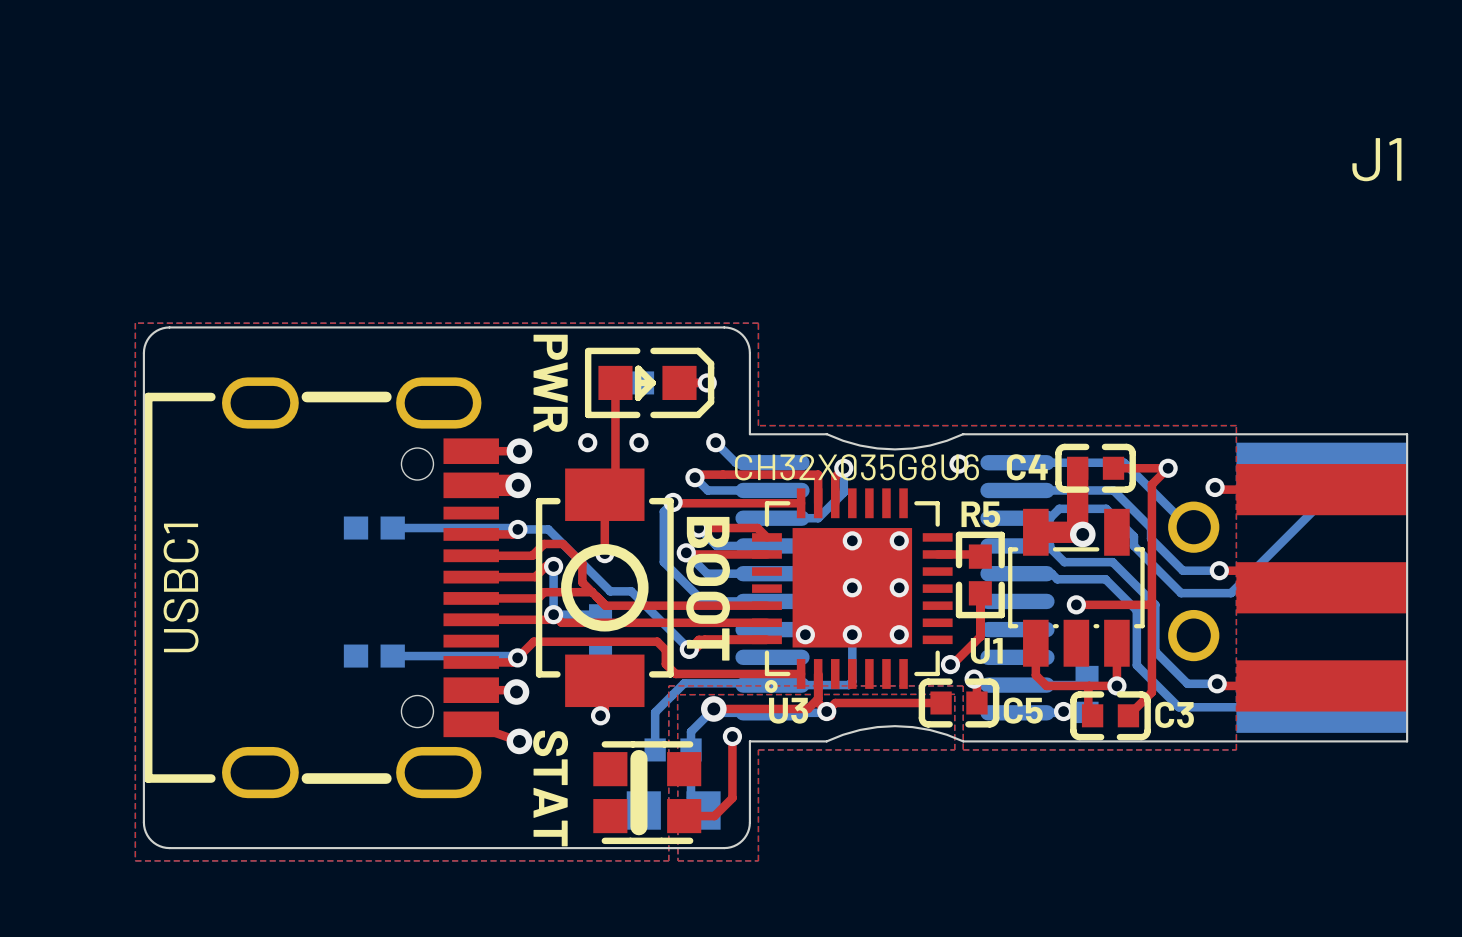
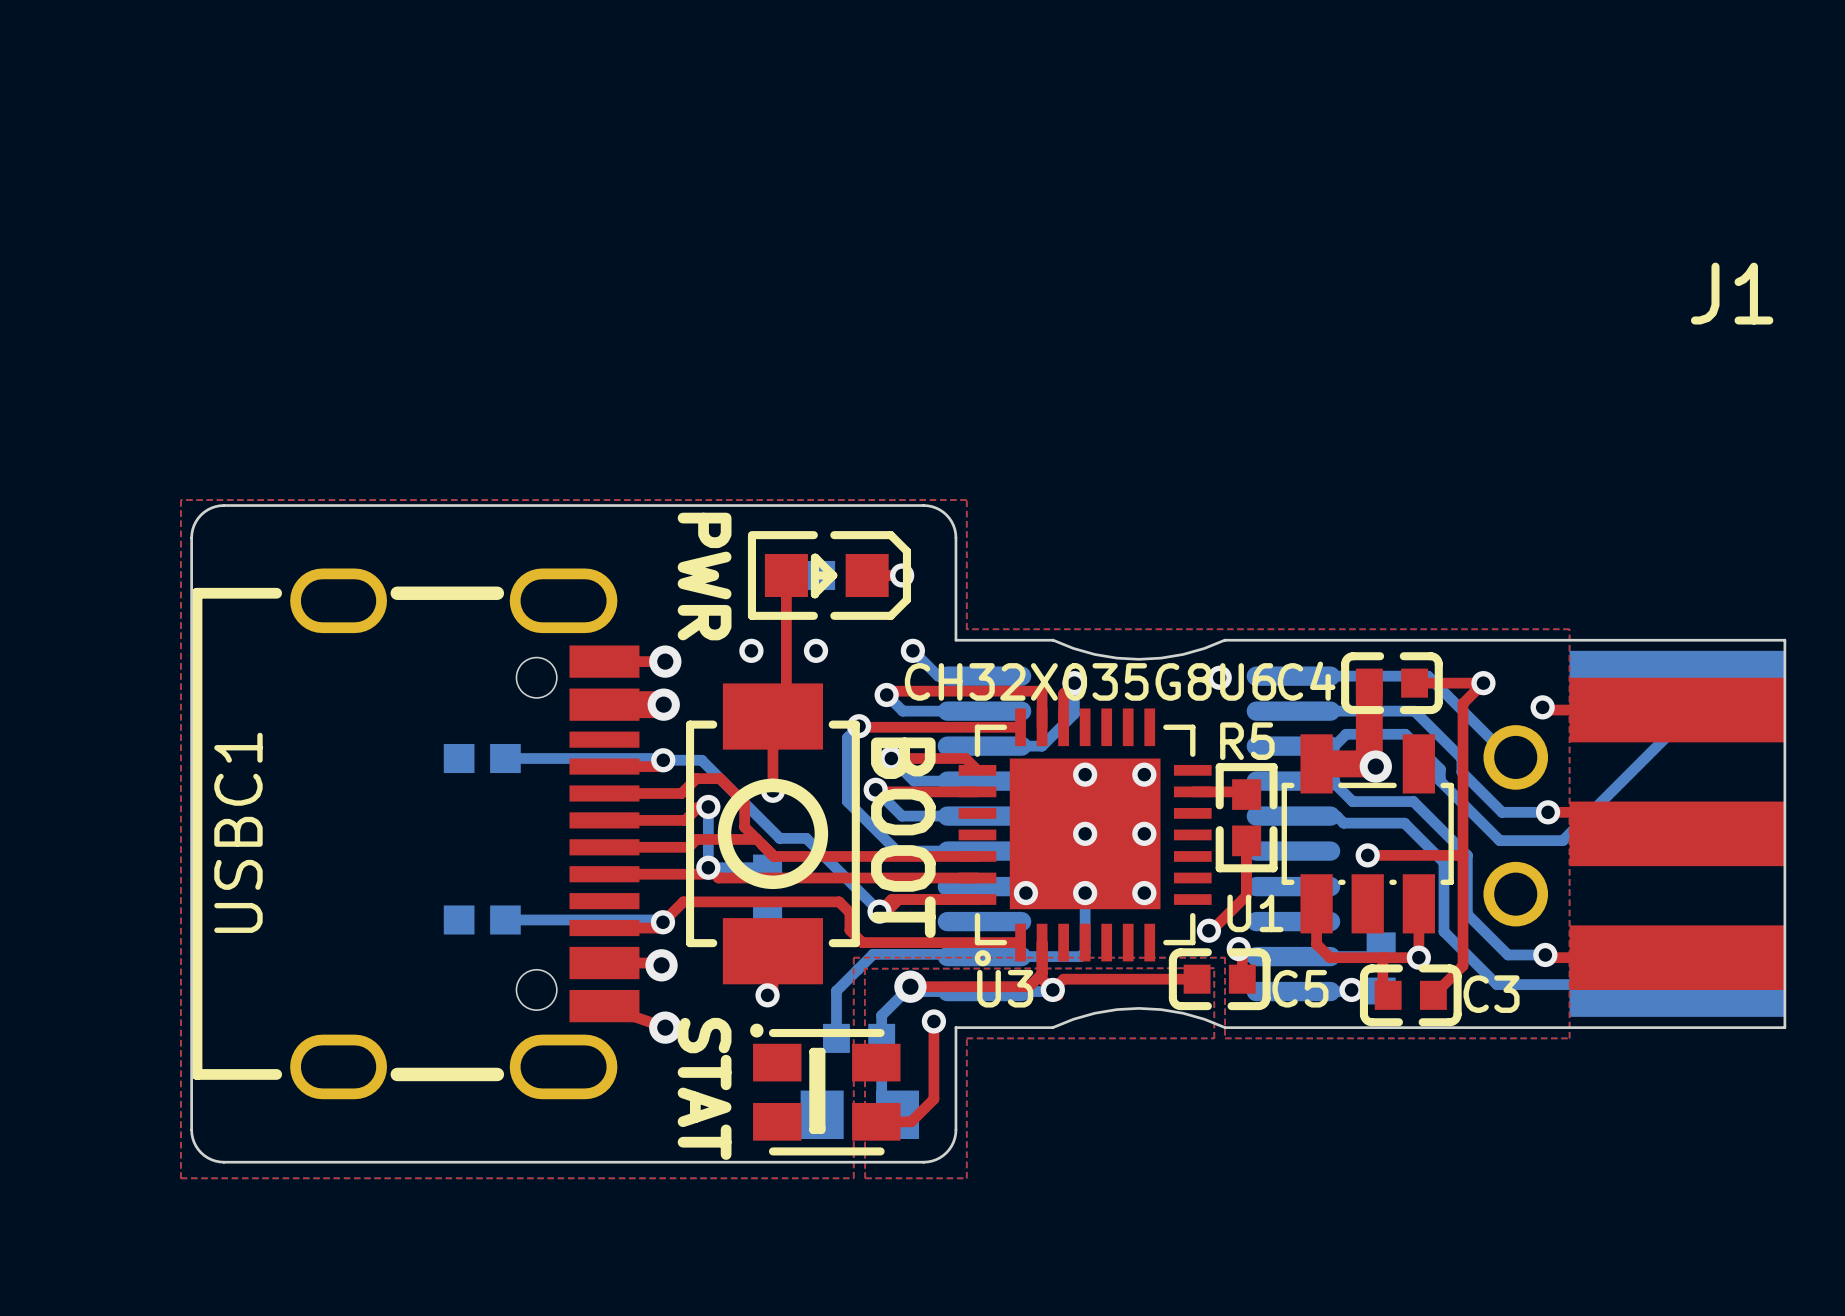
part footprint: [593, 741, 702, 845] -> [750, 1023, 901, 1156]

